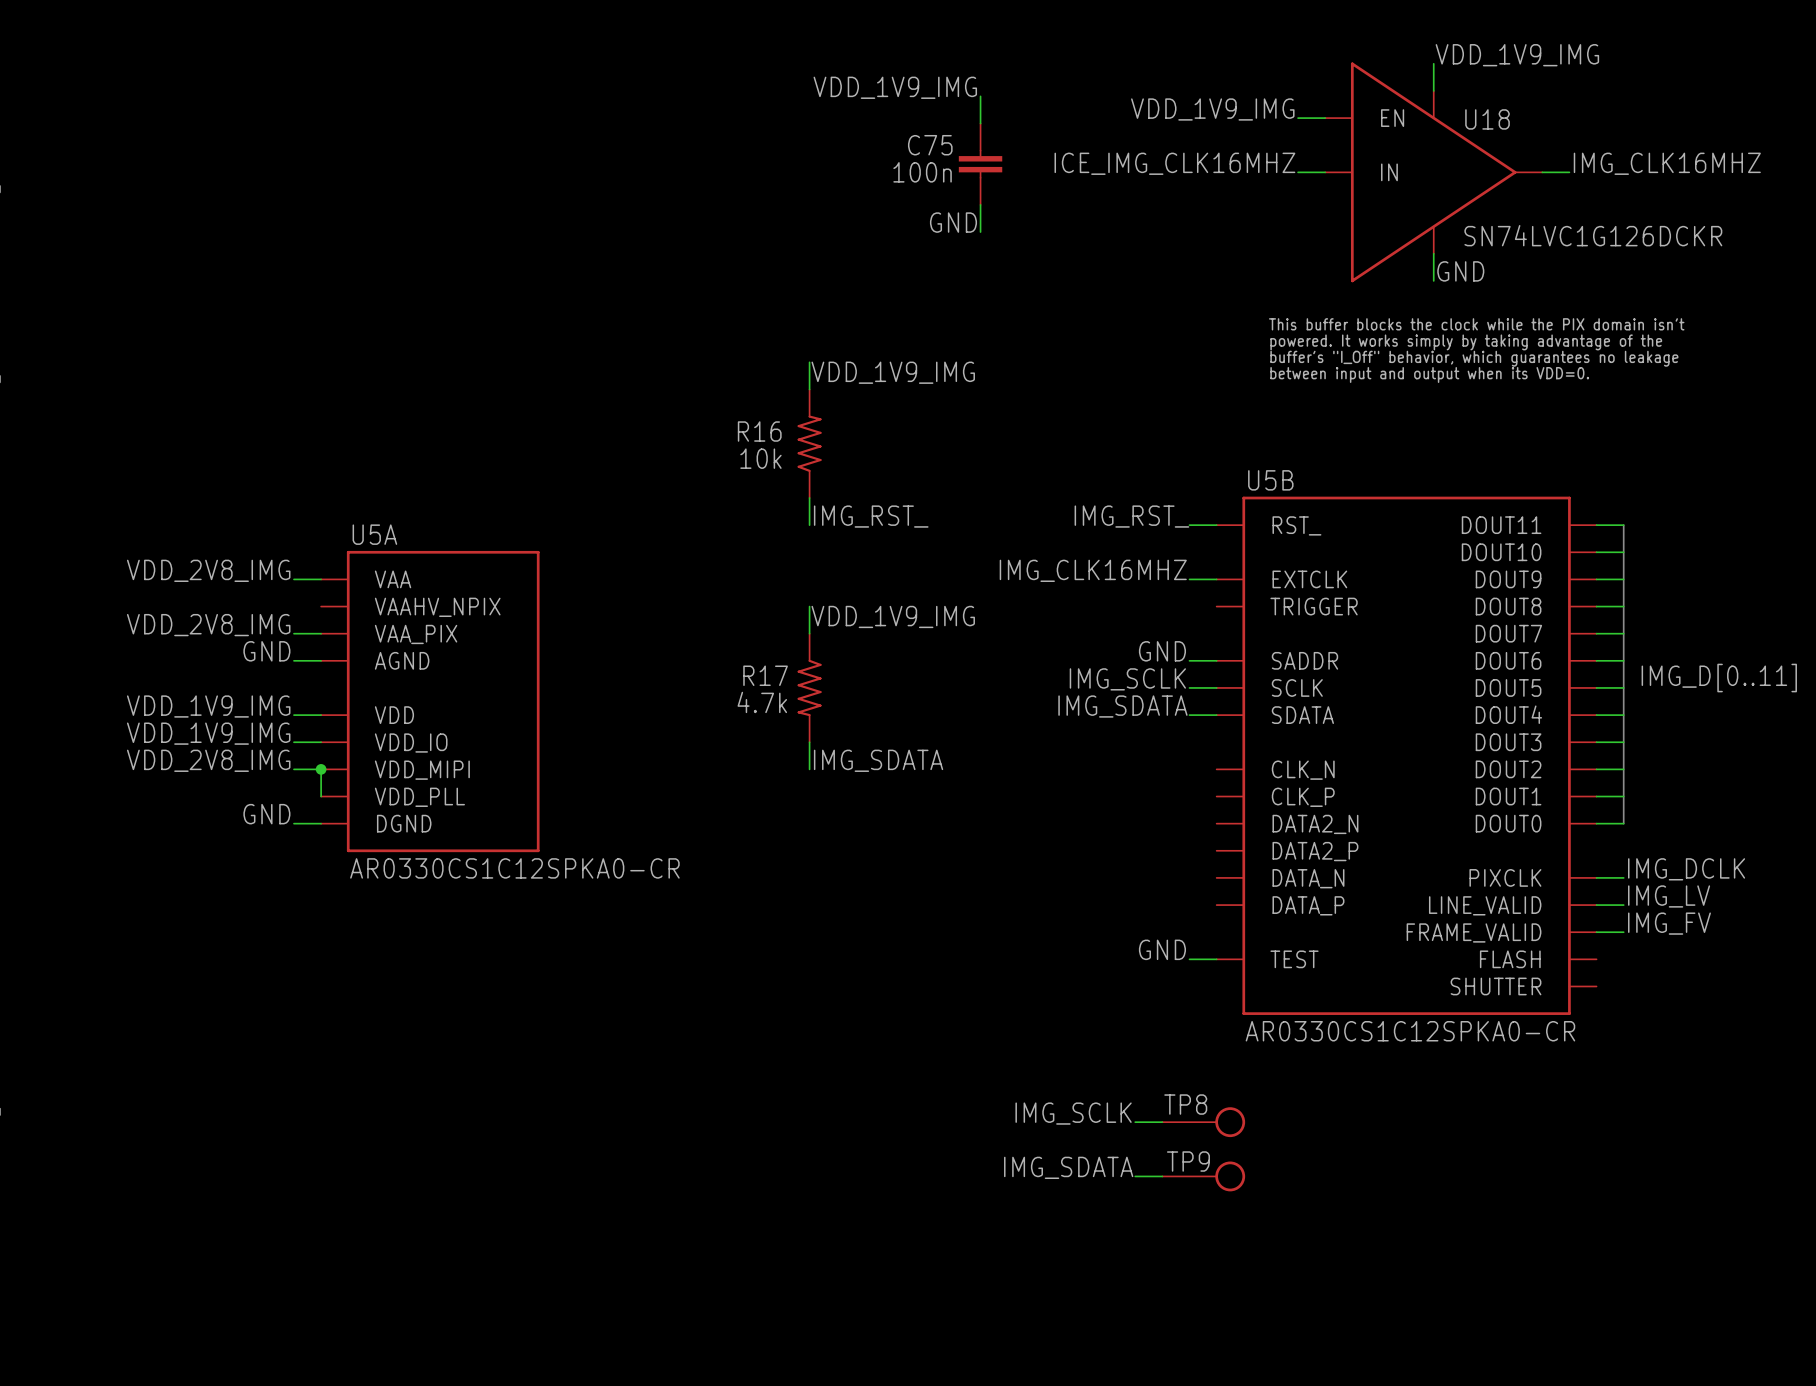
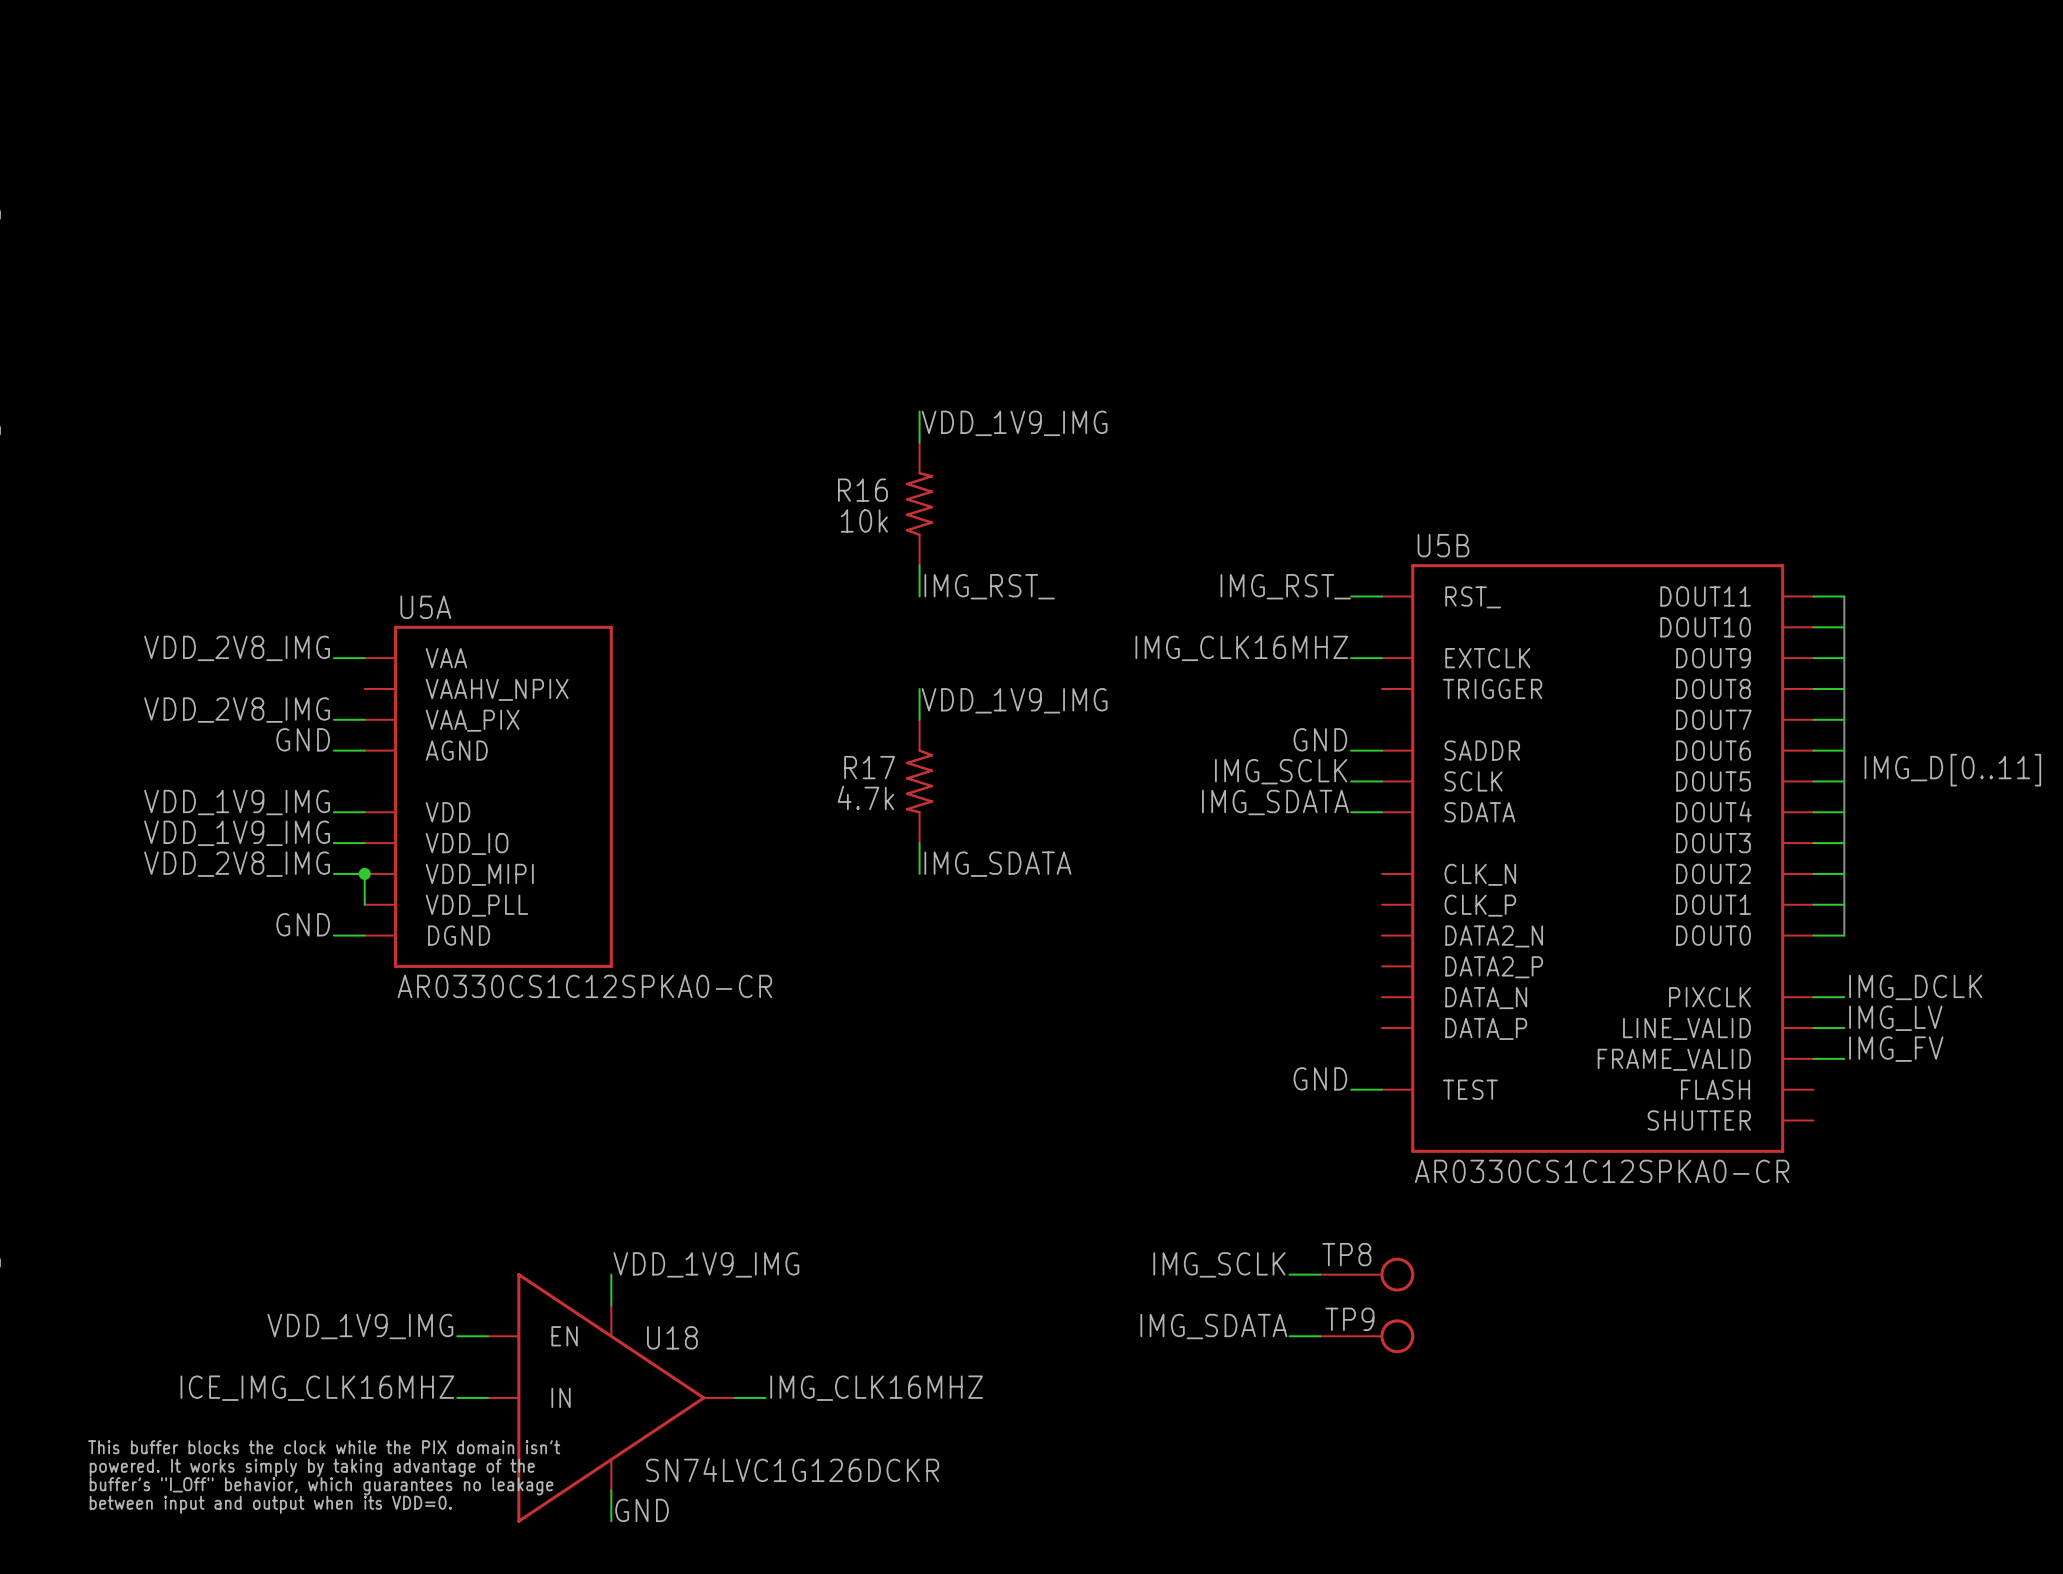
label: VDD_1V9_IMG (1517, 55) -> none
wire: (1433, 63) (1433, 90) -> none
label: VDD_1V9_IMG (895, 87) -> none
wire: (980, 96) (980, 123) -> none
label: VDD_1V9_IMG (1212, 109) -> none
wire: (1298, 118) (1325, 118) -> none
label: ICE_IMG_CLK16MHZ (1174, 163) -> none
label: IMG_CLK16MHZ (1667, 163) -> none
C75: 100n (980, 164) -> none
wire: (1298, 172) (1325, 172) -> none
U18 position: (1433, 172) -> (611, 1397)
wire: (1542, 172) (1569, 172) -> none
wire: (980, 204) (980, 232) -> none
label: GND (953, 222) -> none
wire: (1433, 253) (1433, 280) -> none
label: GND (1460, 271) -> none
text: This buffer blocks the clock while the PIX domain isn't (1476, 324) -> none
text: powered. It works simply by taking advantage of the (1466, 342) -> none
text: buffer's "I_Off" behavior, which guarantees no leakage (1474, 358) -> none
text: between input and output when its VDD=0. (1429, 374) -> none
label: none -> VDD_1V9_IMG (706, 1264)
wire: none -> (611, 1274) (611, 1305)
label: none -> VDD_1V9_IMG (360, 1326)
wire: none -> (457, 1336) (488, 1336)
label: none -> ICE_IMG_CLK16MHZ (317, 1388)
label: none -> IMG_CLK16MHZ (876, 1388)
wire: none -> (457, 1397) (488, 1397)
wire: none -> (734, 1397) (765, 1397)
text: none -> This buffer blocks the clock while the PIX domain isn't (324, 1447)
text: none -> powered. It works simply by taking advantage of the (312, 1467)
text: none -> buffer's "I_Off" behavior, which guarantees no leakage (321, 1486)
wire: none -> (611, 1490) (611, 1521)
text: none -> between input and output when its VDD=0. (270, 1504)
label: none -> GND (642, 1510)

